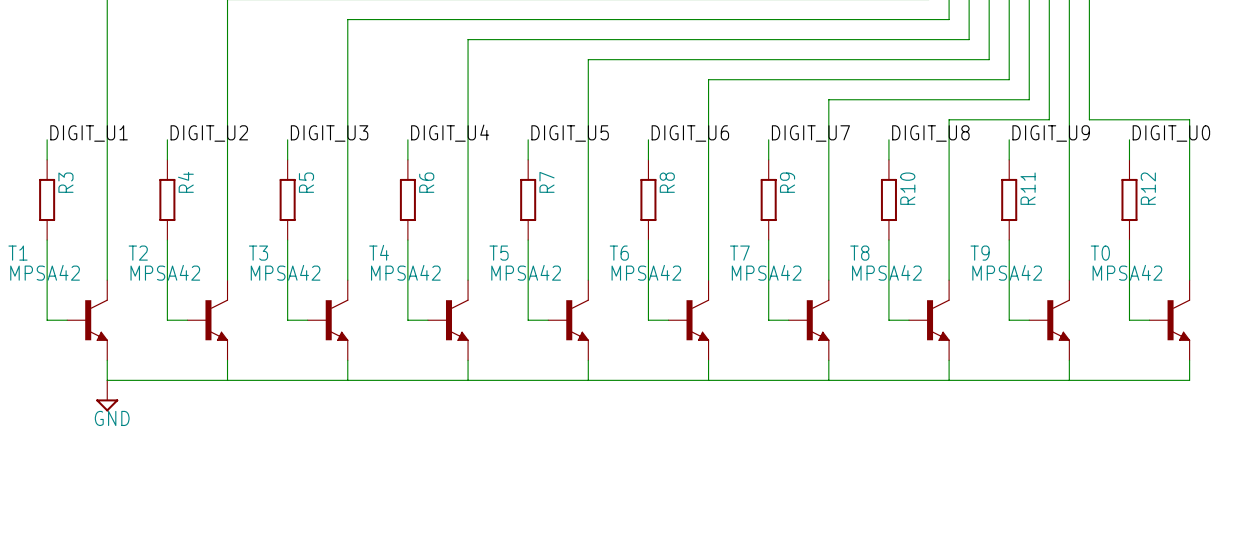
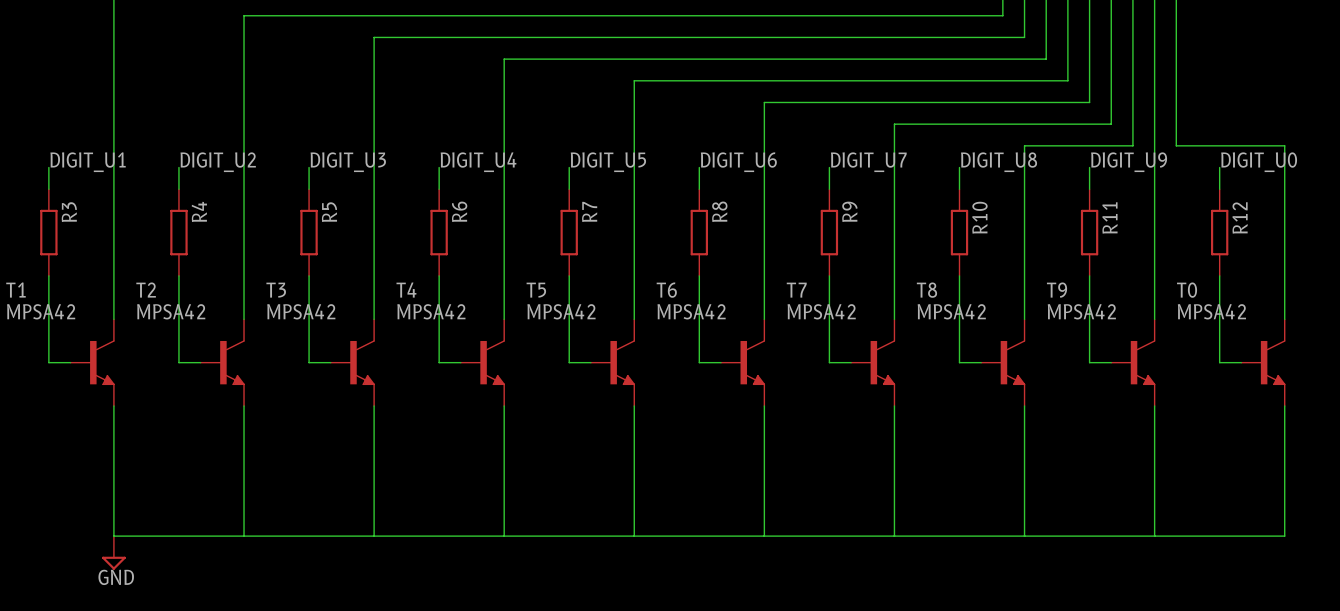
wire: (107, 380) (1189, 380) -> (113, 427) (113, 536) (1284, 536) (1284, 427)
wire: none -> (244, 427) (244, 536)
wire: none -> (374, 427) (374, 536)
wire: none -> (504, 427) (504, 536)
wire: none -> (634, 427) (634, 536)
wire: none -> (764, 427) (764, 536)
wire: none -> (894, 427) (894, 536)
wire: none -> (1024, 427) (1024, 536)
wire: none -> (1154, 427) (1154, 536)
power symbol position: GND (107, 395) -> GND (113, 552)

